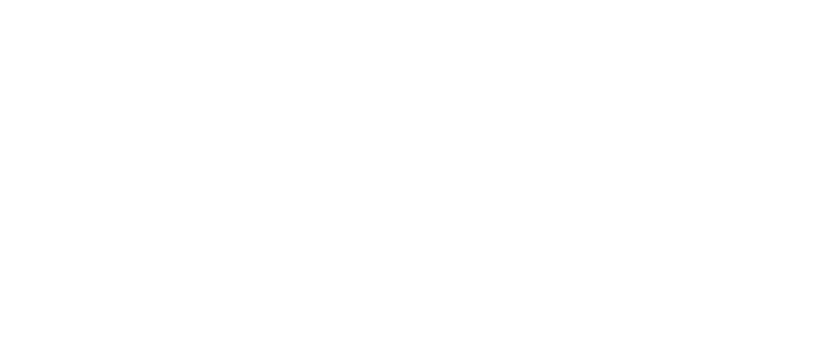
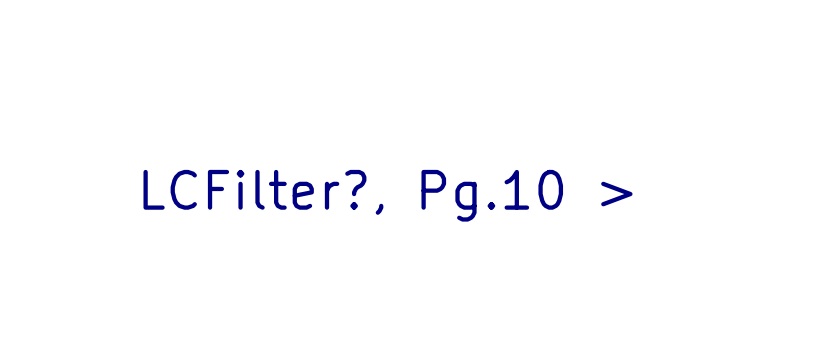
text: none -> LCFilter?, Pg.10 > (388, 195)

